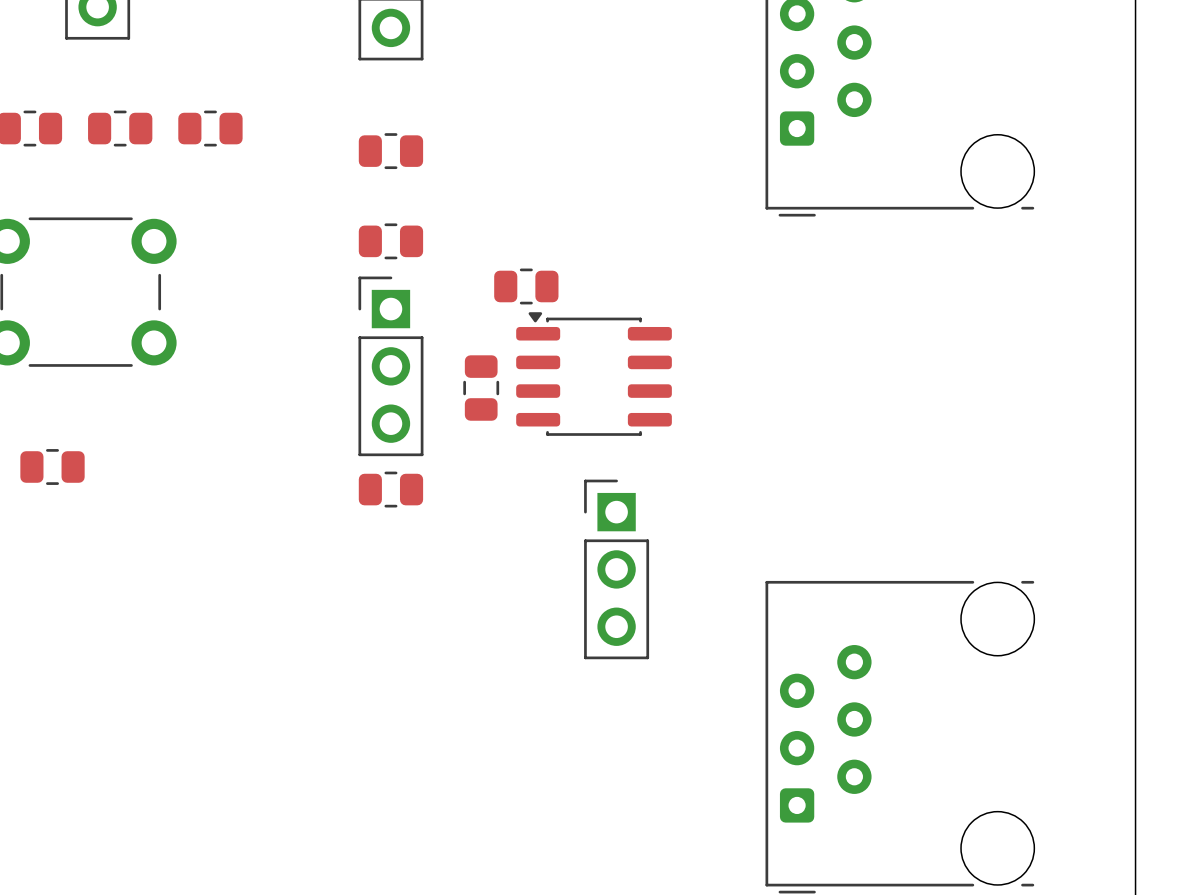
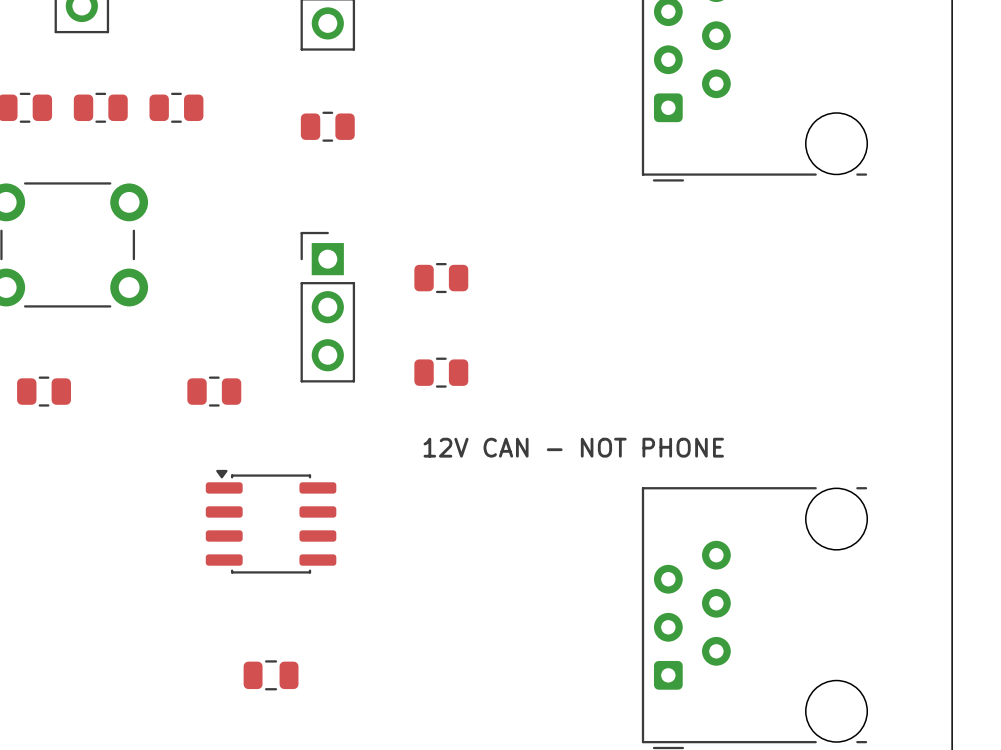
part: (390, 241) -> none
part position: (526, 286) -> (441, 278)
part position: (594, 374) -> (271, 521)
part rotation: 0° (481, 388) -> 90° clockwise (271, 675)
part position: (481, 388) -> (271, 675)
part: none -> (441, 372)
part: none -> (214, 391)
part: (390, 489) -> none
text: none -> 12V CAN - NOT PHONE (573, 447)
part: (616, 569) -> none

